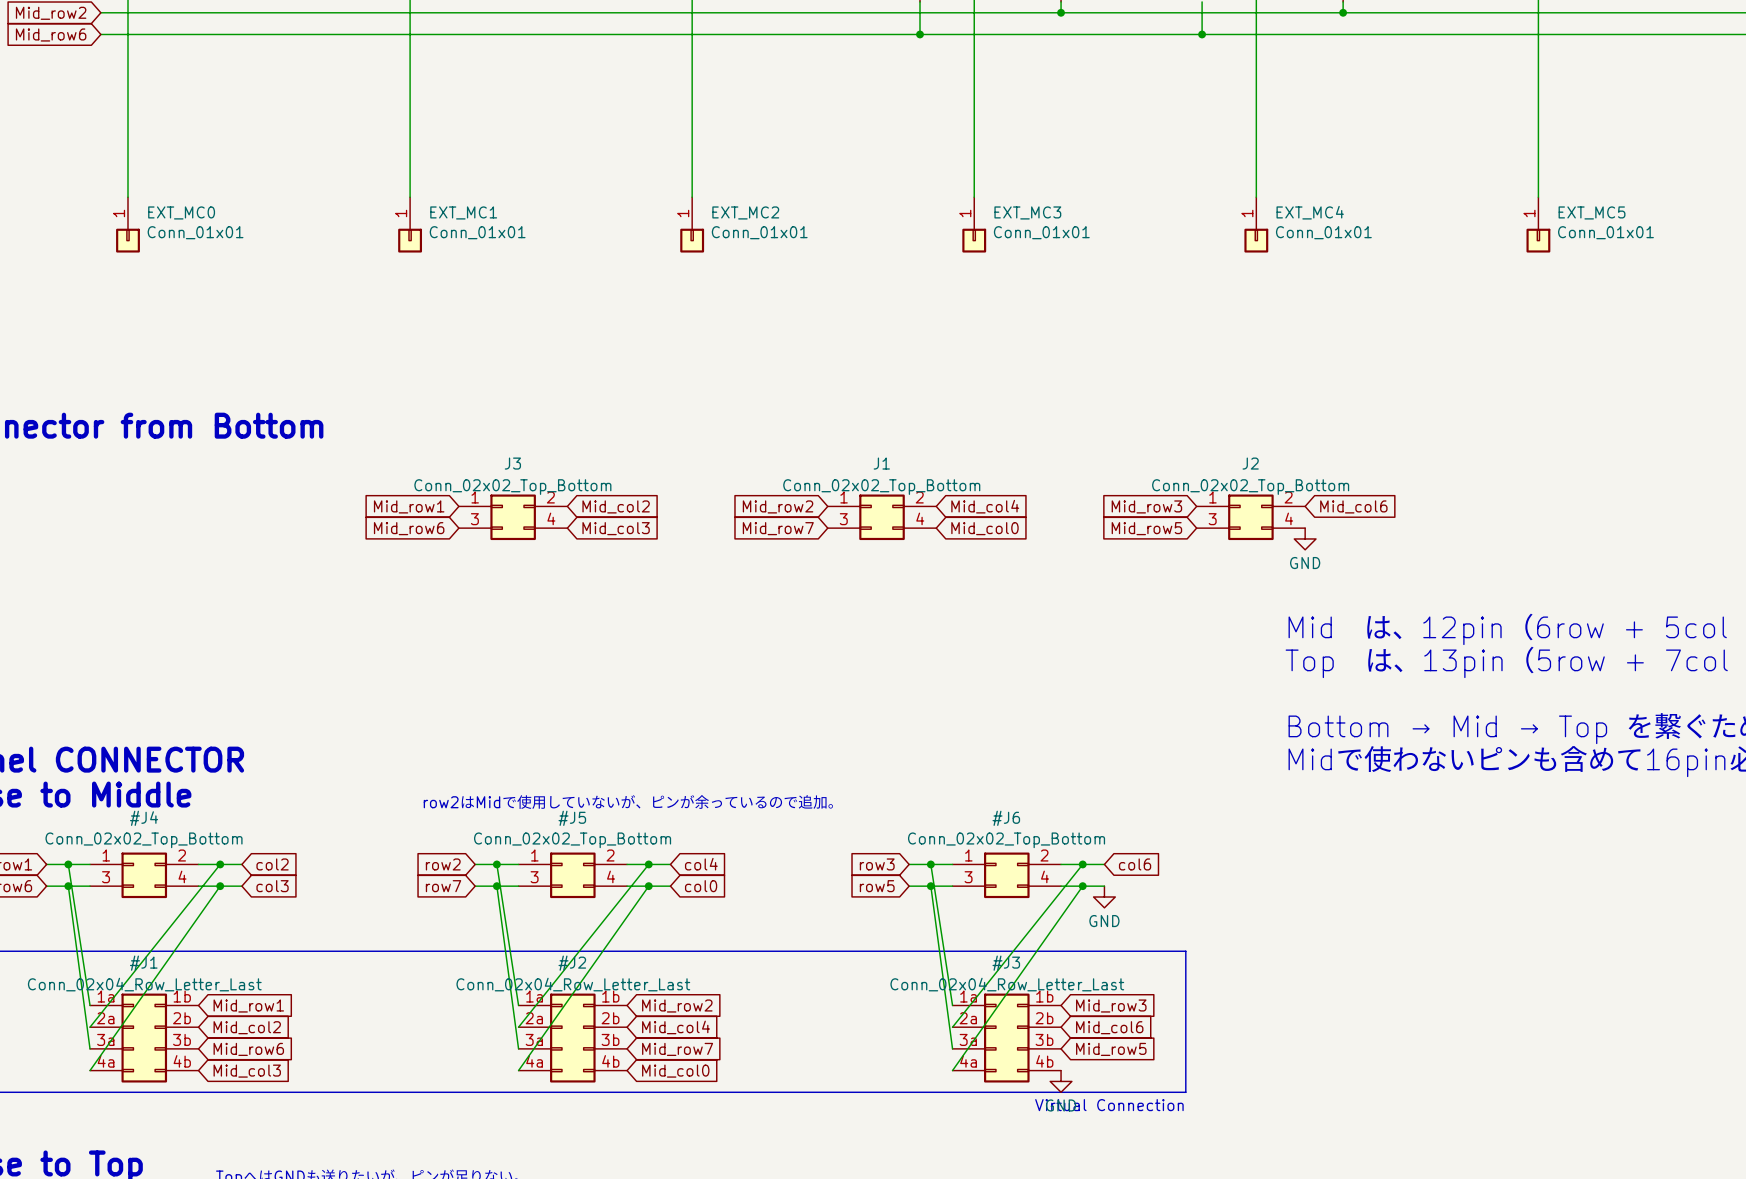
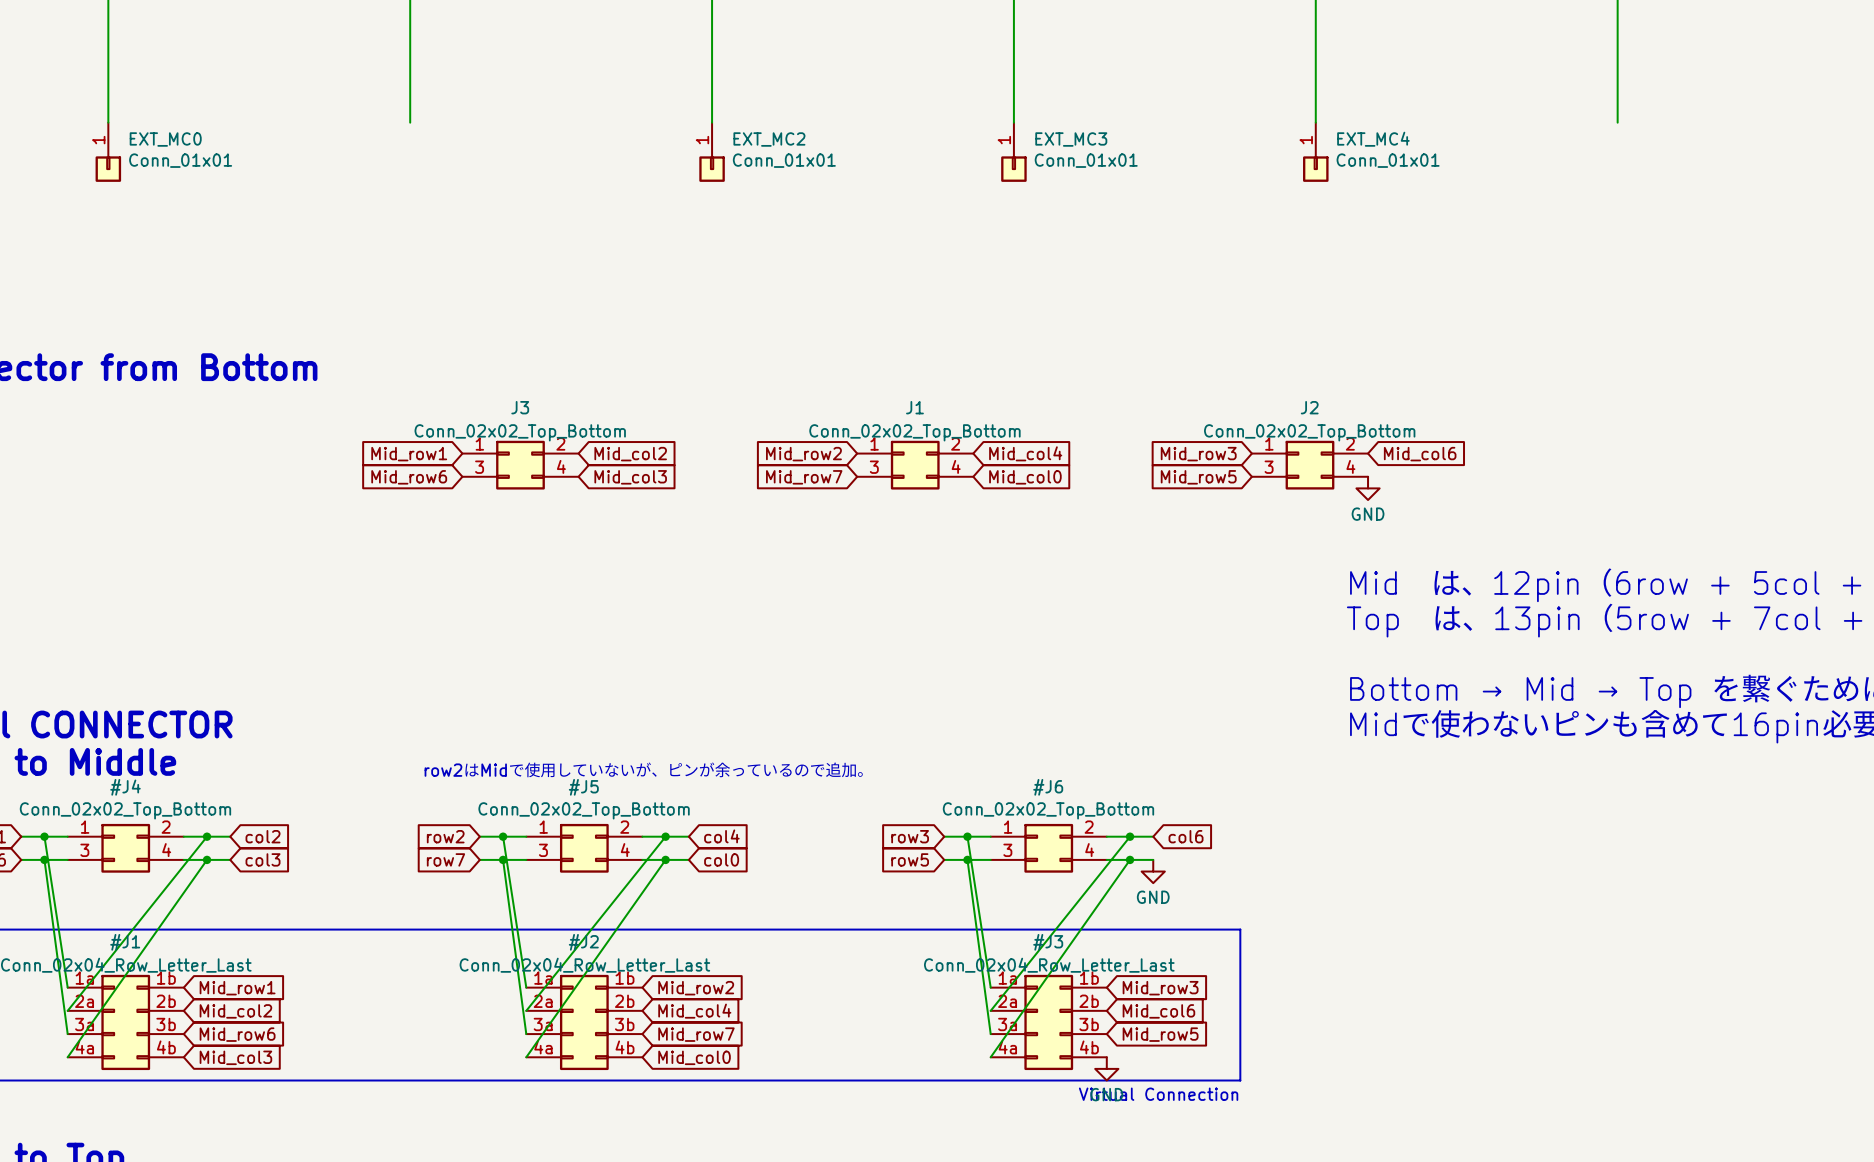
EXT_MC1: Conn_01x01 (410, 224) -> none
EXT_MC5: Conn_01x01 (1538, 224) -> none

